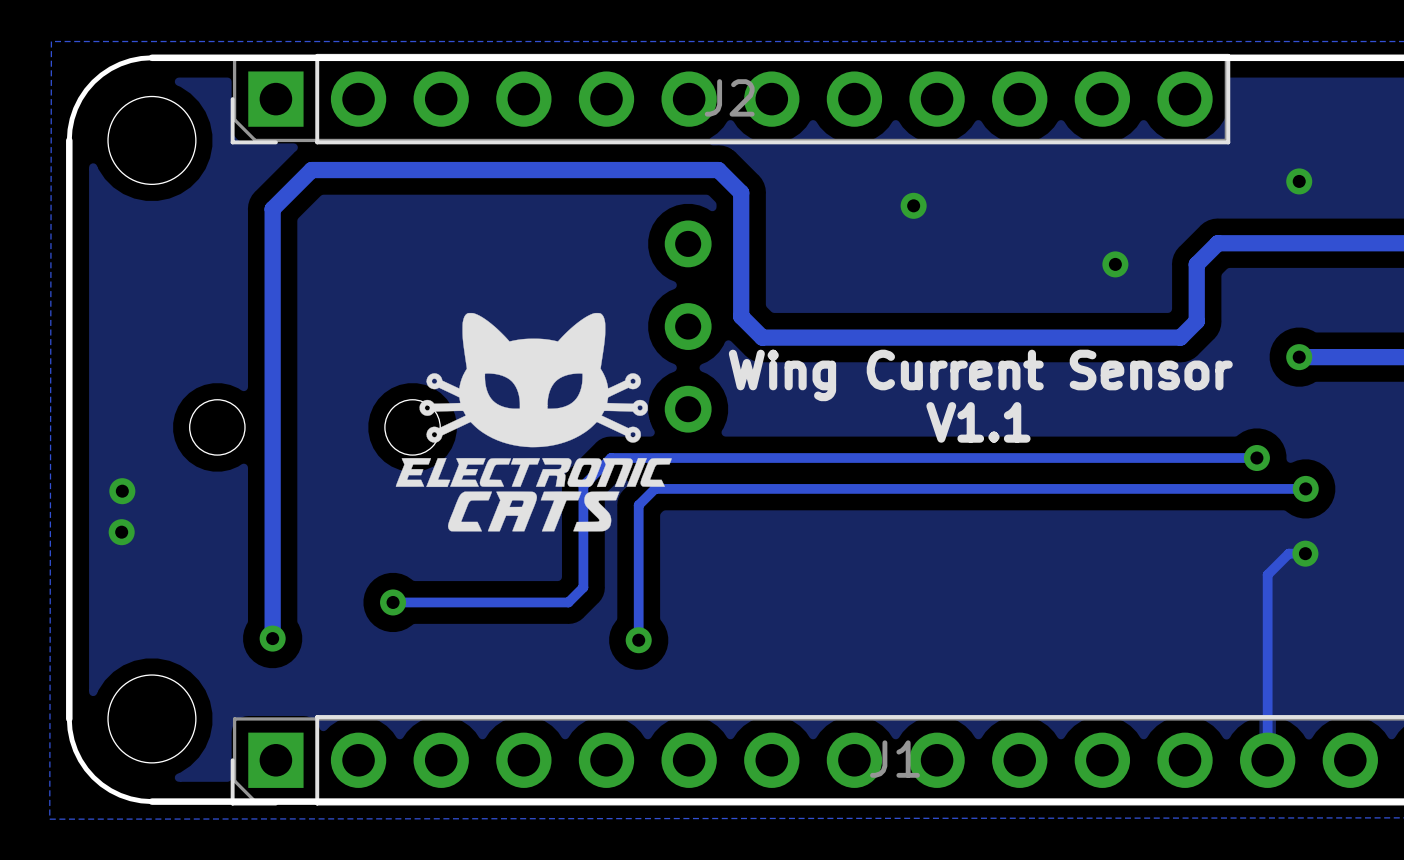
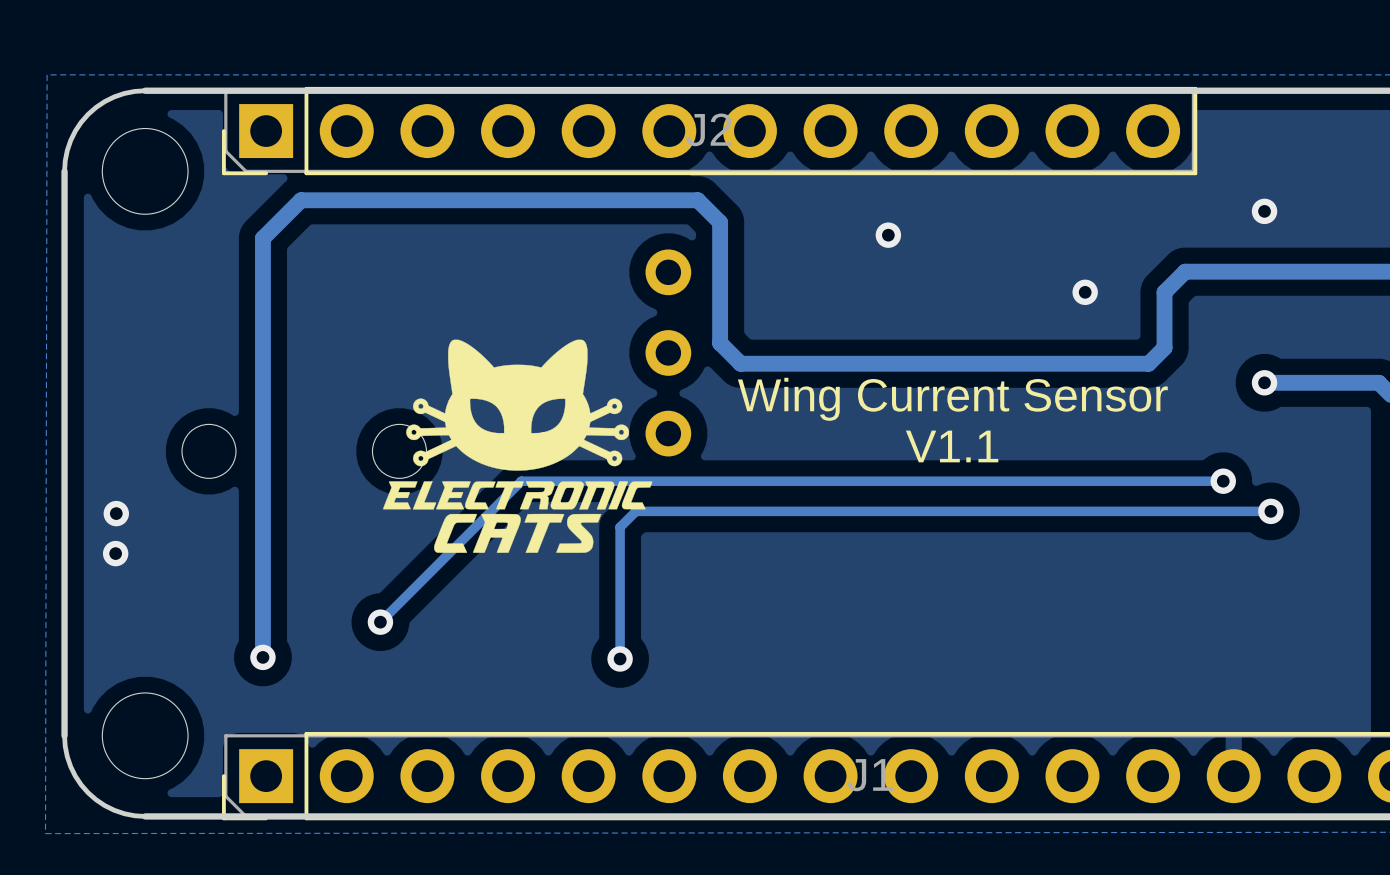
track: (611, 458) (583, 485) (583, 587) (568, 602) (393, 602) -> (593, 481) (521, 481) (380, 622)
track: (1305, 553) (1288, 553) (1267, 574) (1267, 760) -> none
via: (1305, 553) -> none

